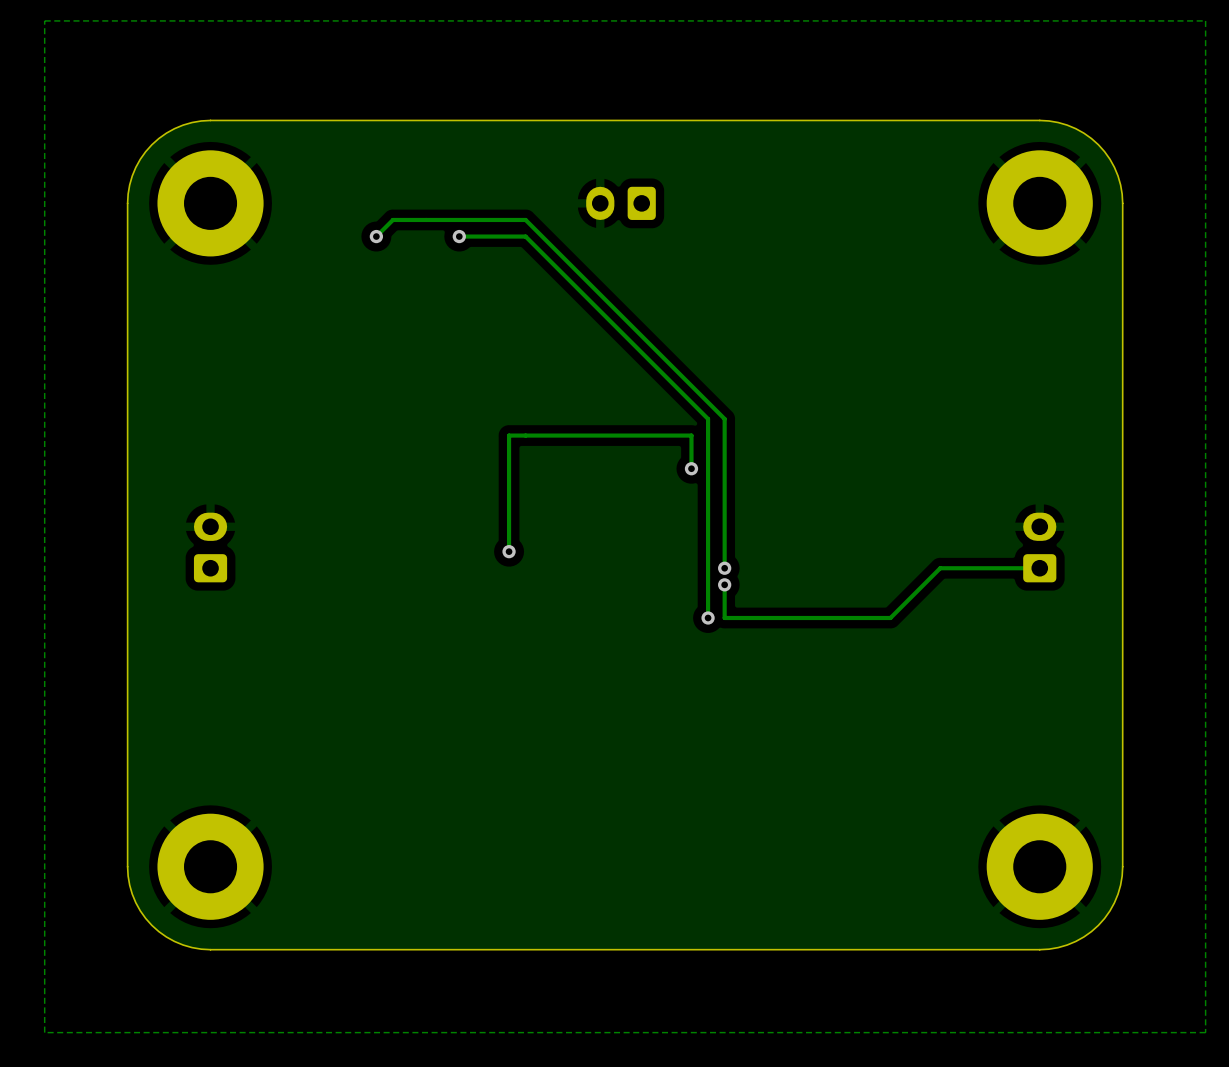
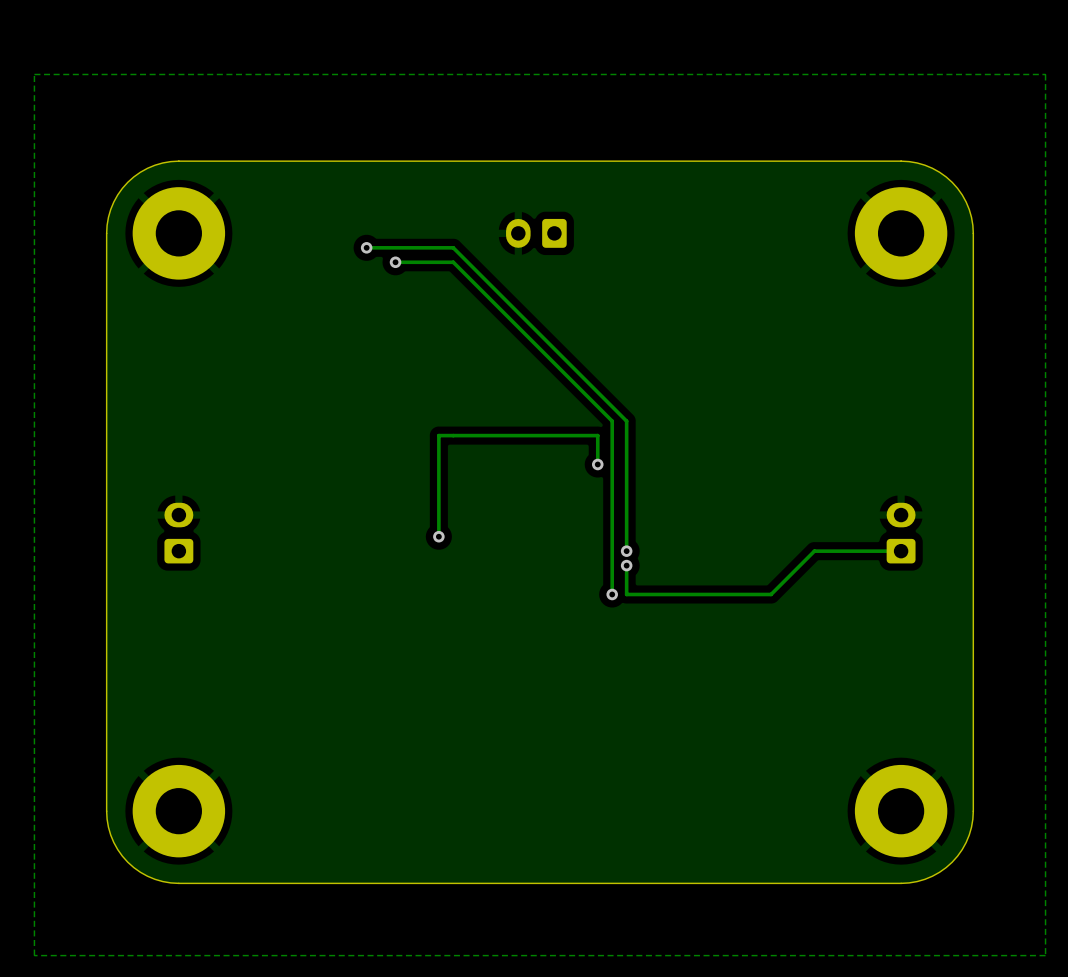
track: (426, 219) (392, 219) (376, 236) -> none
via position: (376, 236) -> (366, 247)

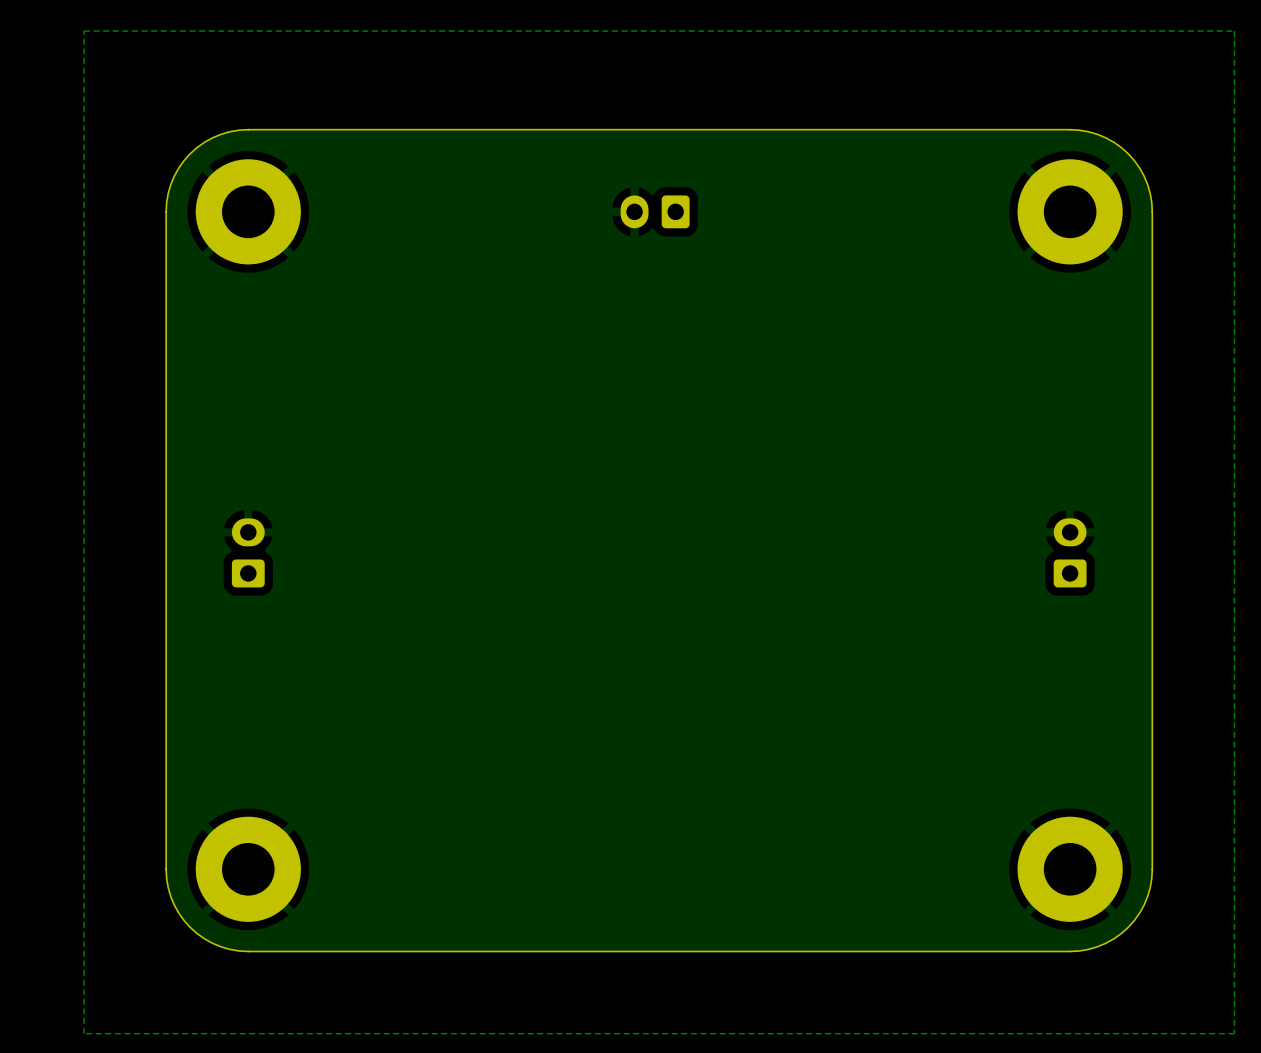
track: (366, 247) (453, 247) (626, 421) (626, 551) -> none
via: (366, 247) -> none
track: (395, 262) (453, 262) (612, 421) (612, 594) -> none
via: (395, 262) -> none
track: (597, 464) (597, 435) (438, 435) (438, 536) -> none
via: (597, 464) -> none
via: (438, 536) -> none
via: (626, 551) -> none
track: (901, 551) (814, 551) (771, 594) (626, 594) (626, 565) -> none
via: (626, 565) -> none
via: (612, 594) -> none

